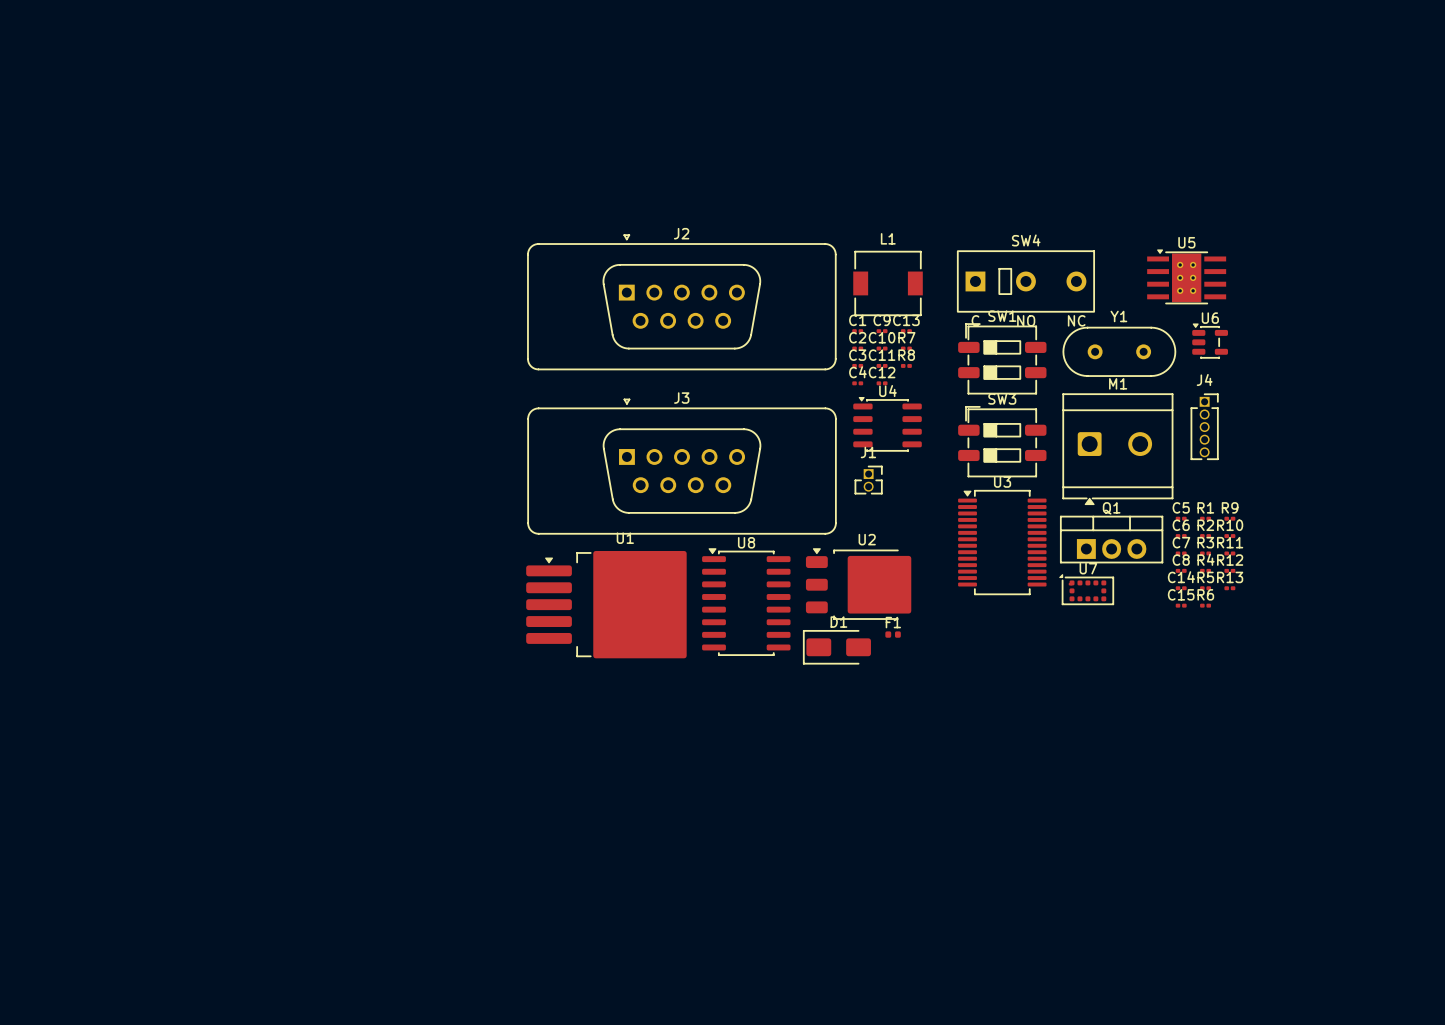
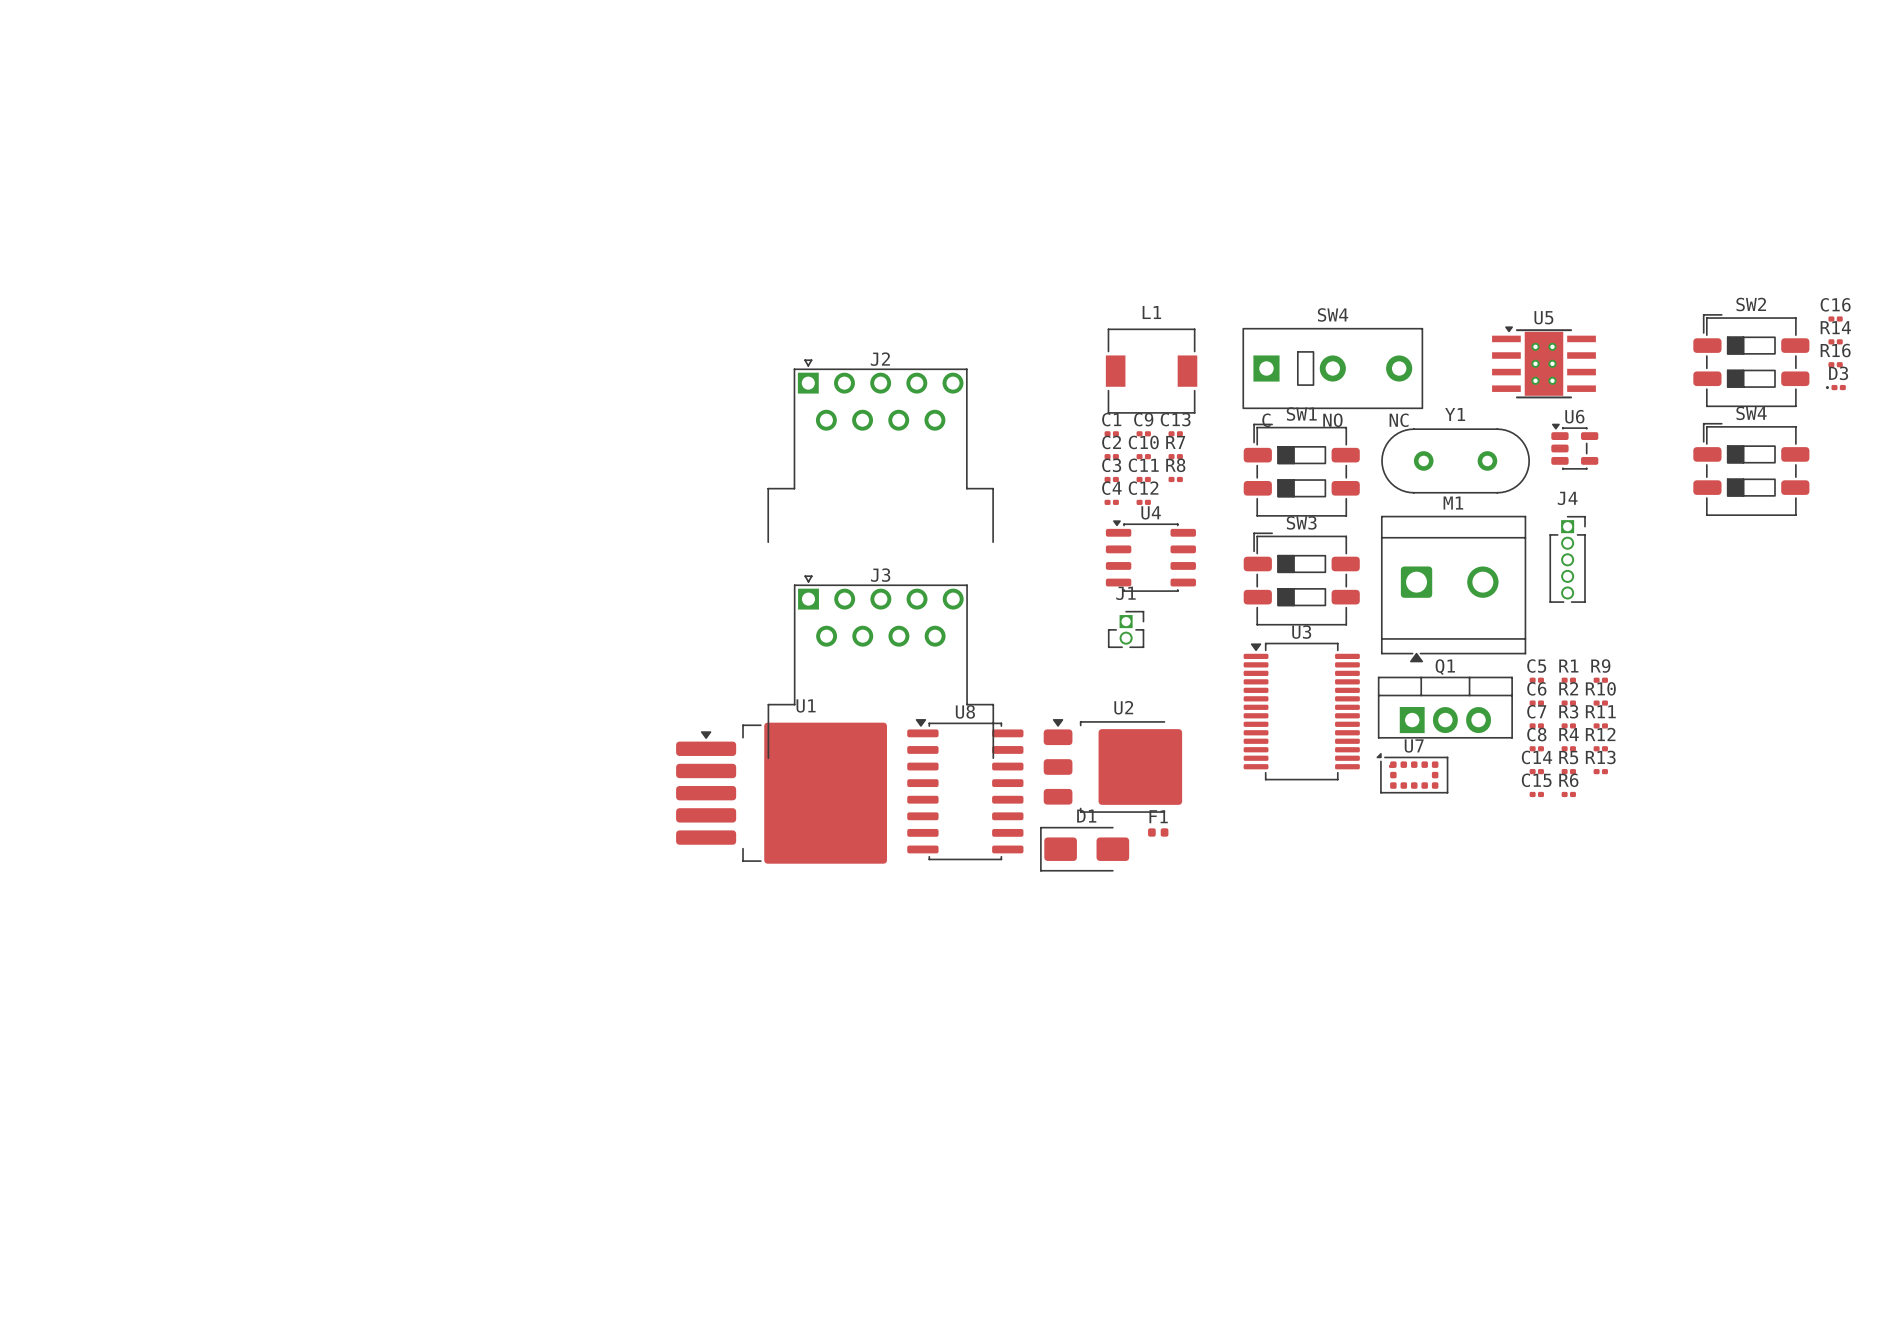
J2 footprint: [527, 234, 837, 371] -> [767, 359, 994, 543]
C16: none -> (1835, 319)
R14: none -> (1835, 341)
SW2: none -> (1751, 360)
R16: none -> (1835, 364)
D3: none -> (1835, 387)
SW4: none -> (1751, 469)
J3 footprint: [527, 398, 837, 535] -> [767, 575, 995, 759]

